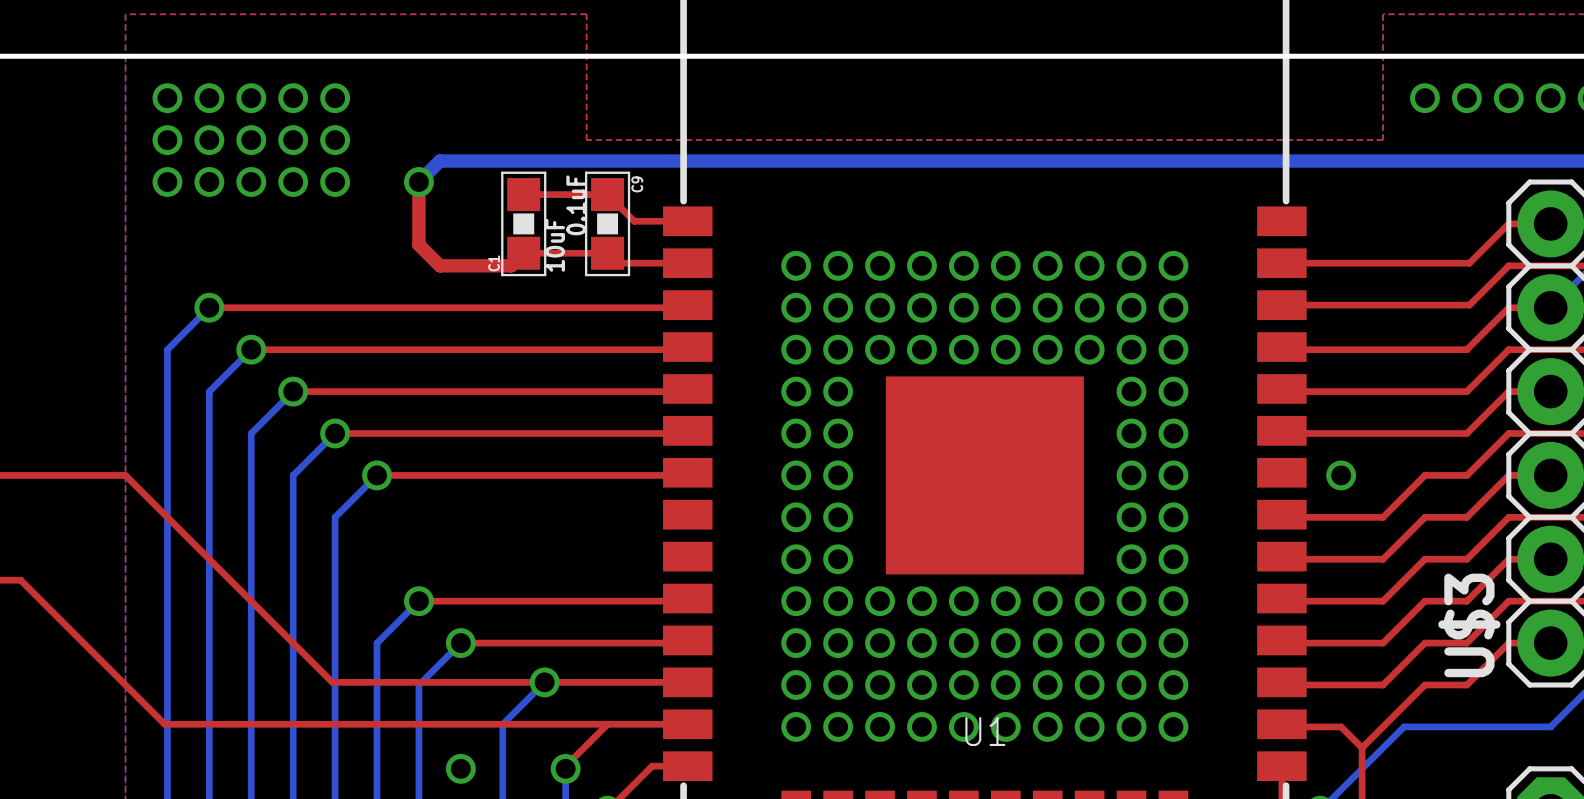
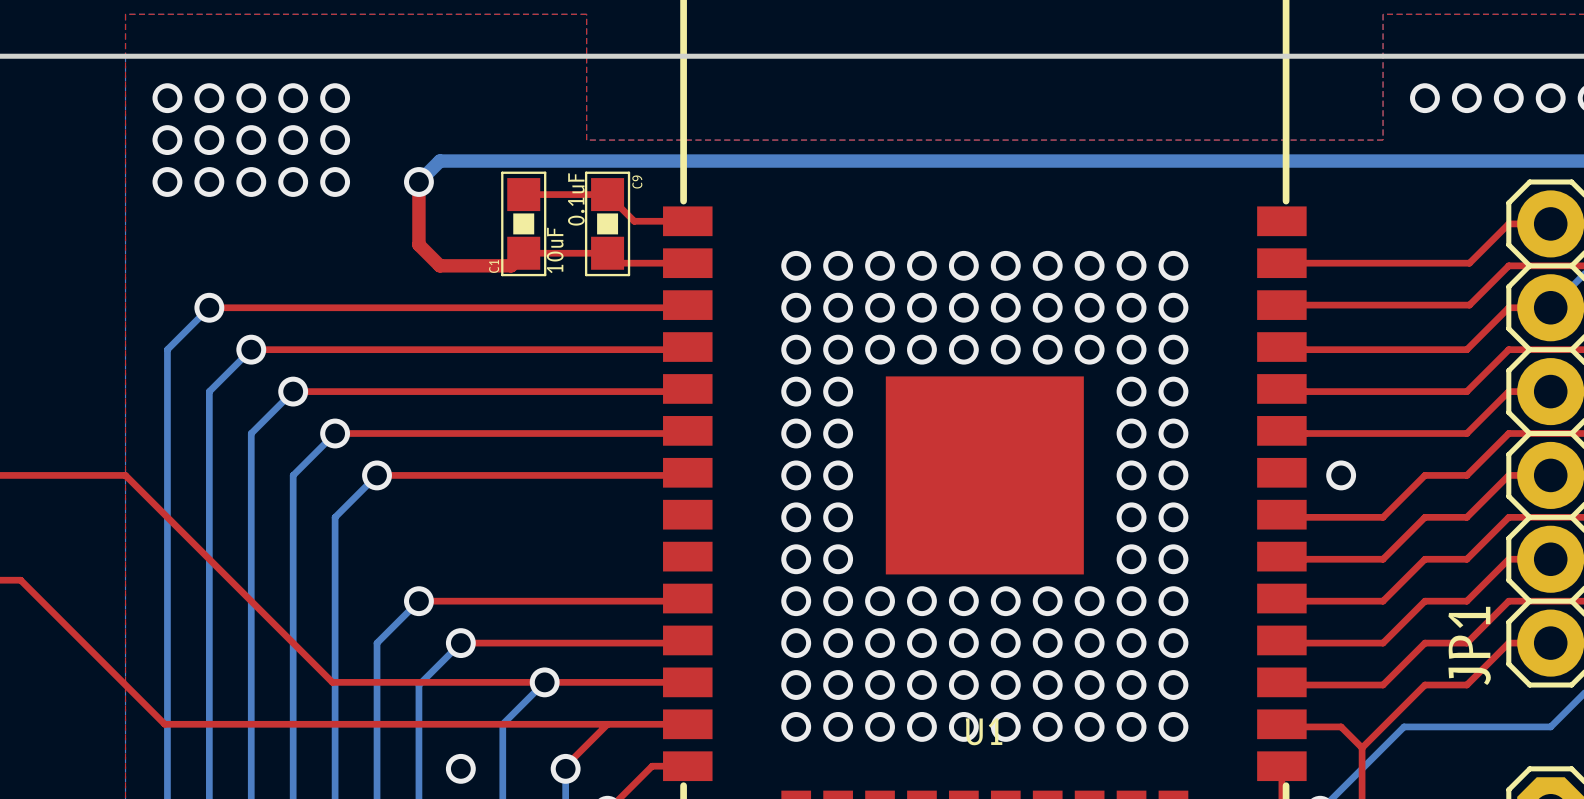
U$3 name: U$3 (1469, 625) -> JP1 (1469, 645)

